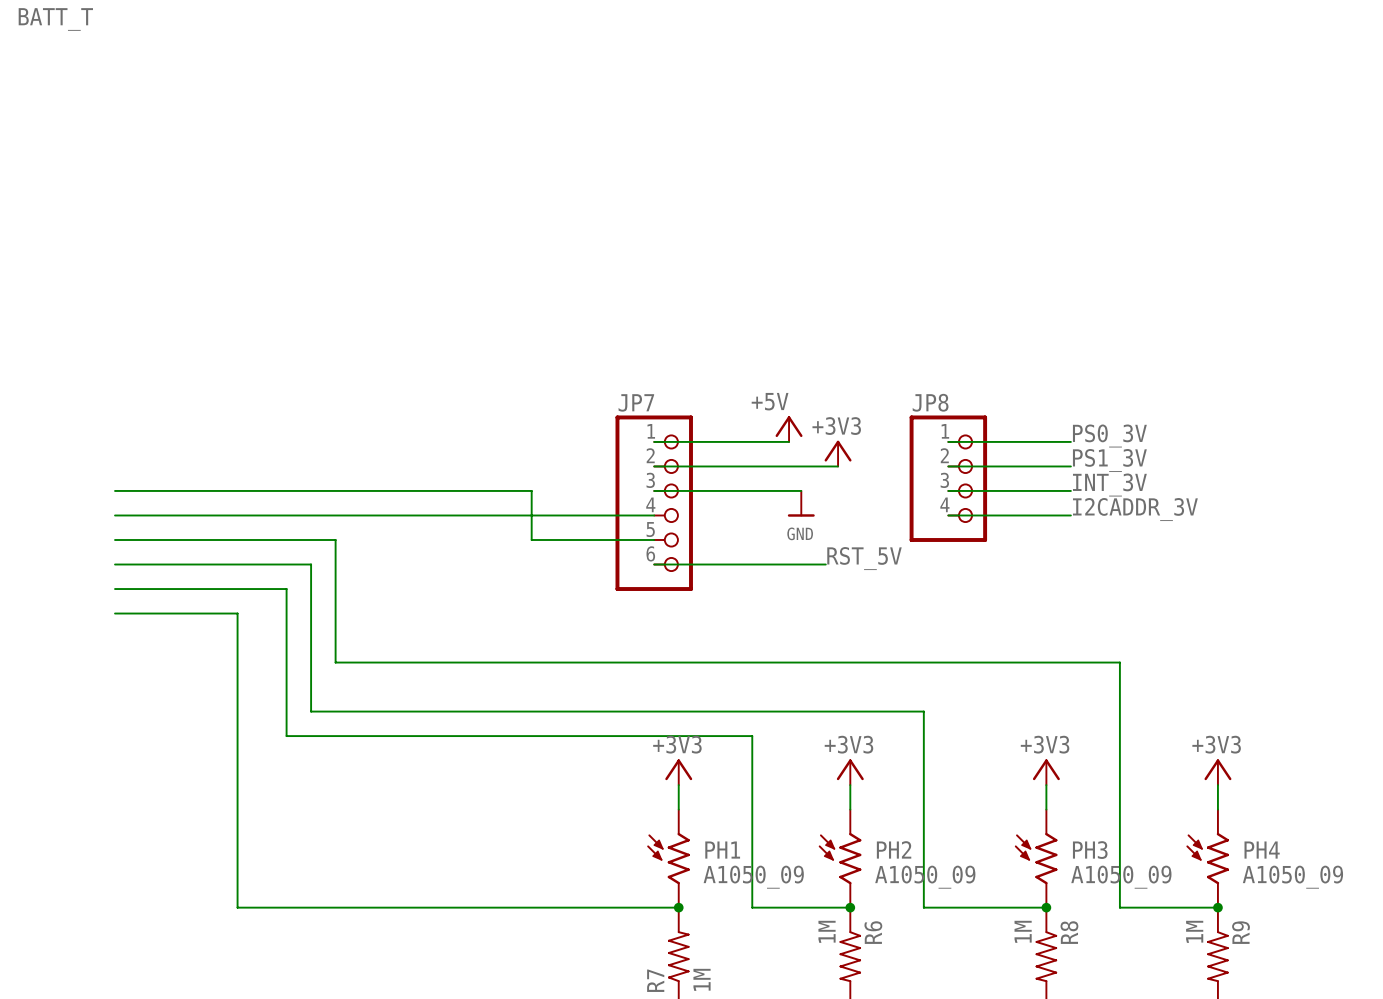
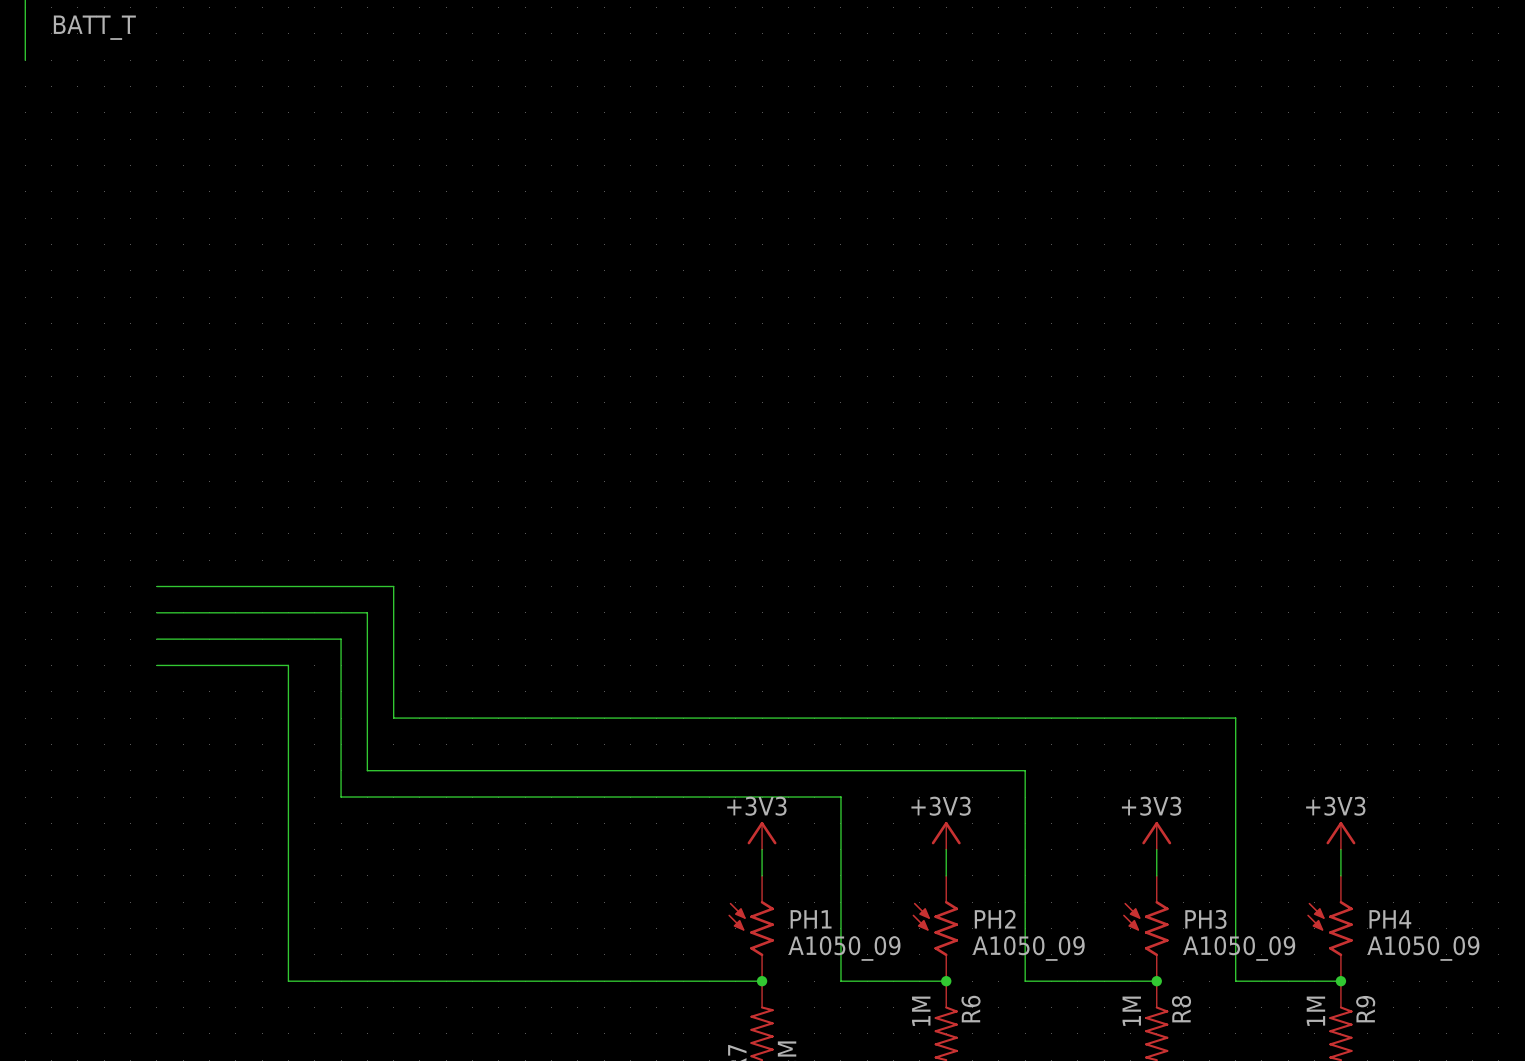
power symbol: +5V (789, 429) -> none
label: PS0_3V (1109, 436) -> none
wire: (654, 441) (789, 441) -> none
wire: (948, 441) (1070, 441) -> none
power symbol: +3V3 (838, 453) -> none
label: PS1_3V (1109, 460) -> none
wire: (654, 466) (838, 466) -> none
wire: (948, 466) (1070, 466) -> none
JP8: (948, 478) -> none
label: INT_3V (1109, 485) -> none
wire: (115, 490) (531, 490) (531, 539) (654, 539) -> none
wire: (654, 490) (801, 490) -> none
wire: (948, 490) (1070, 490) -> none
JP7: (654, 503) -> none
power symbol: GND (801, 503) -> none
label: I2CADDR_3V (1135, 509) -> none
wire: (115, 515) (654, 515) -> none
wire: (948, 515) (1070, 515) -> none
label: RST_5V (864, 558) -> none
wire: (654, 564) (825, 564) -> none

